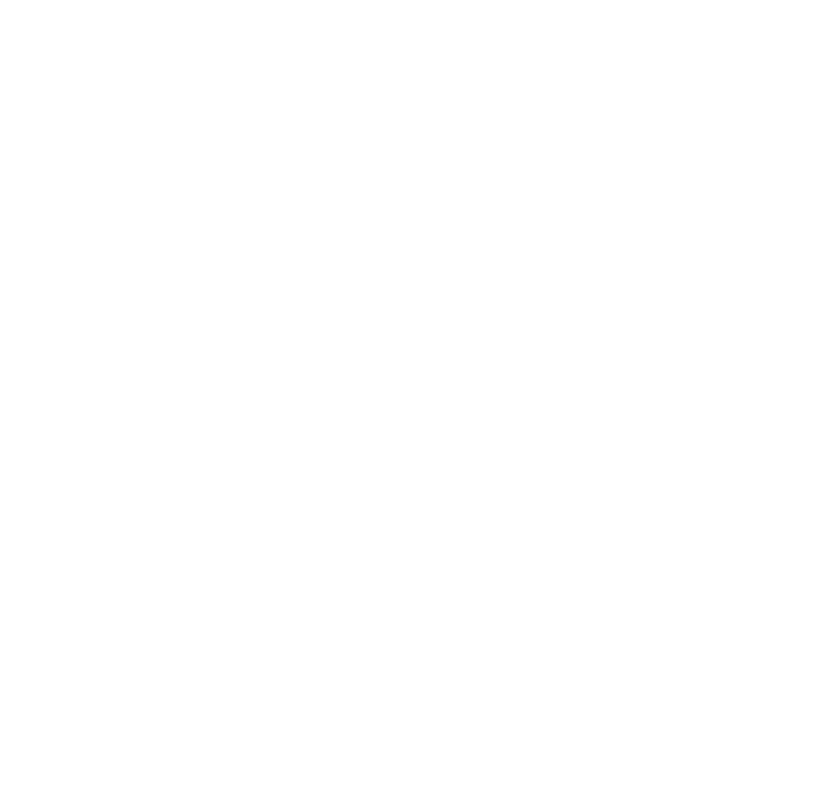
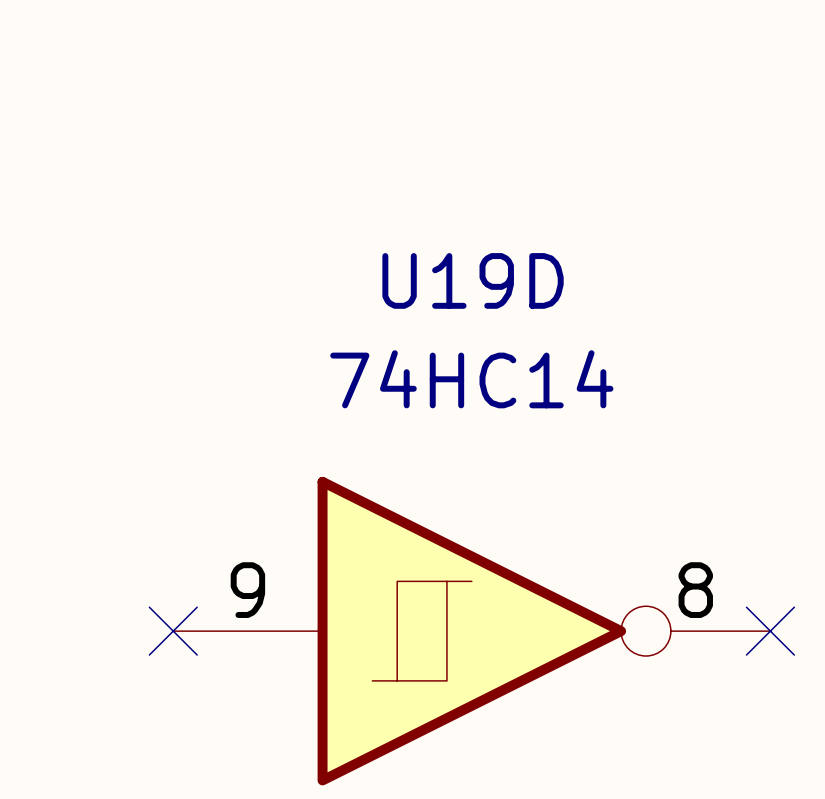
no-connect mark: none -> (173, 631)
U19D: none -> 74HC14 (471, 631)
no-connect mark: none -> (770, 631)

